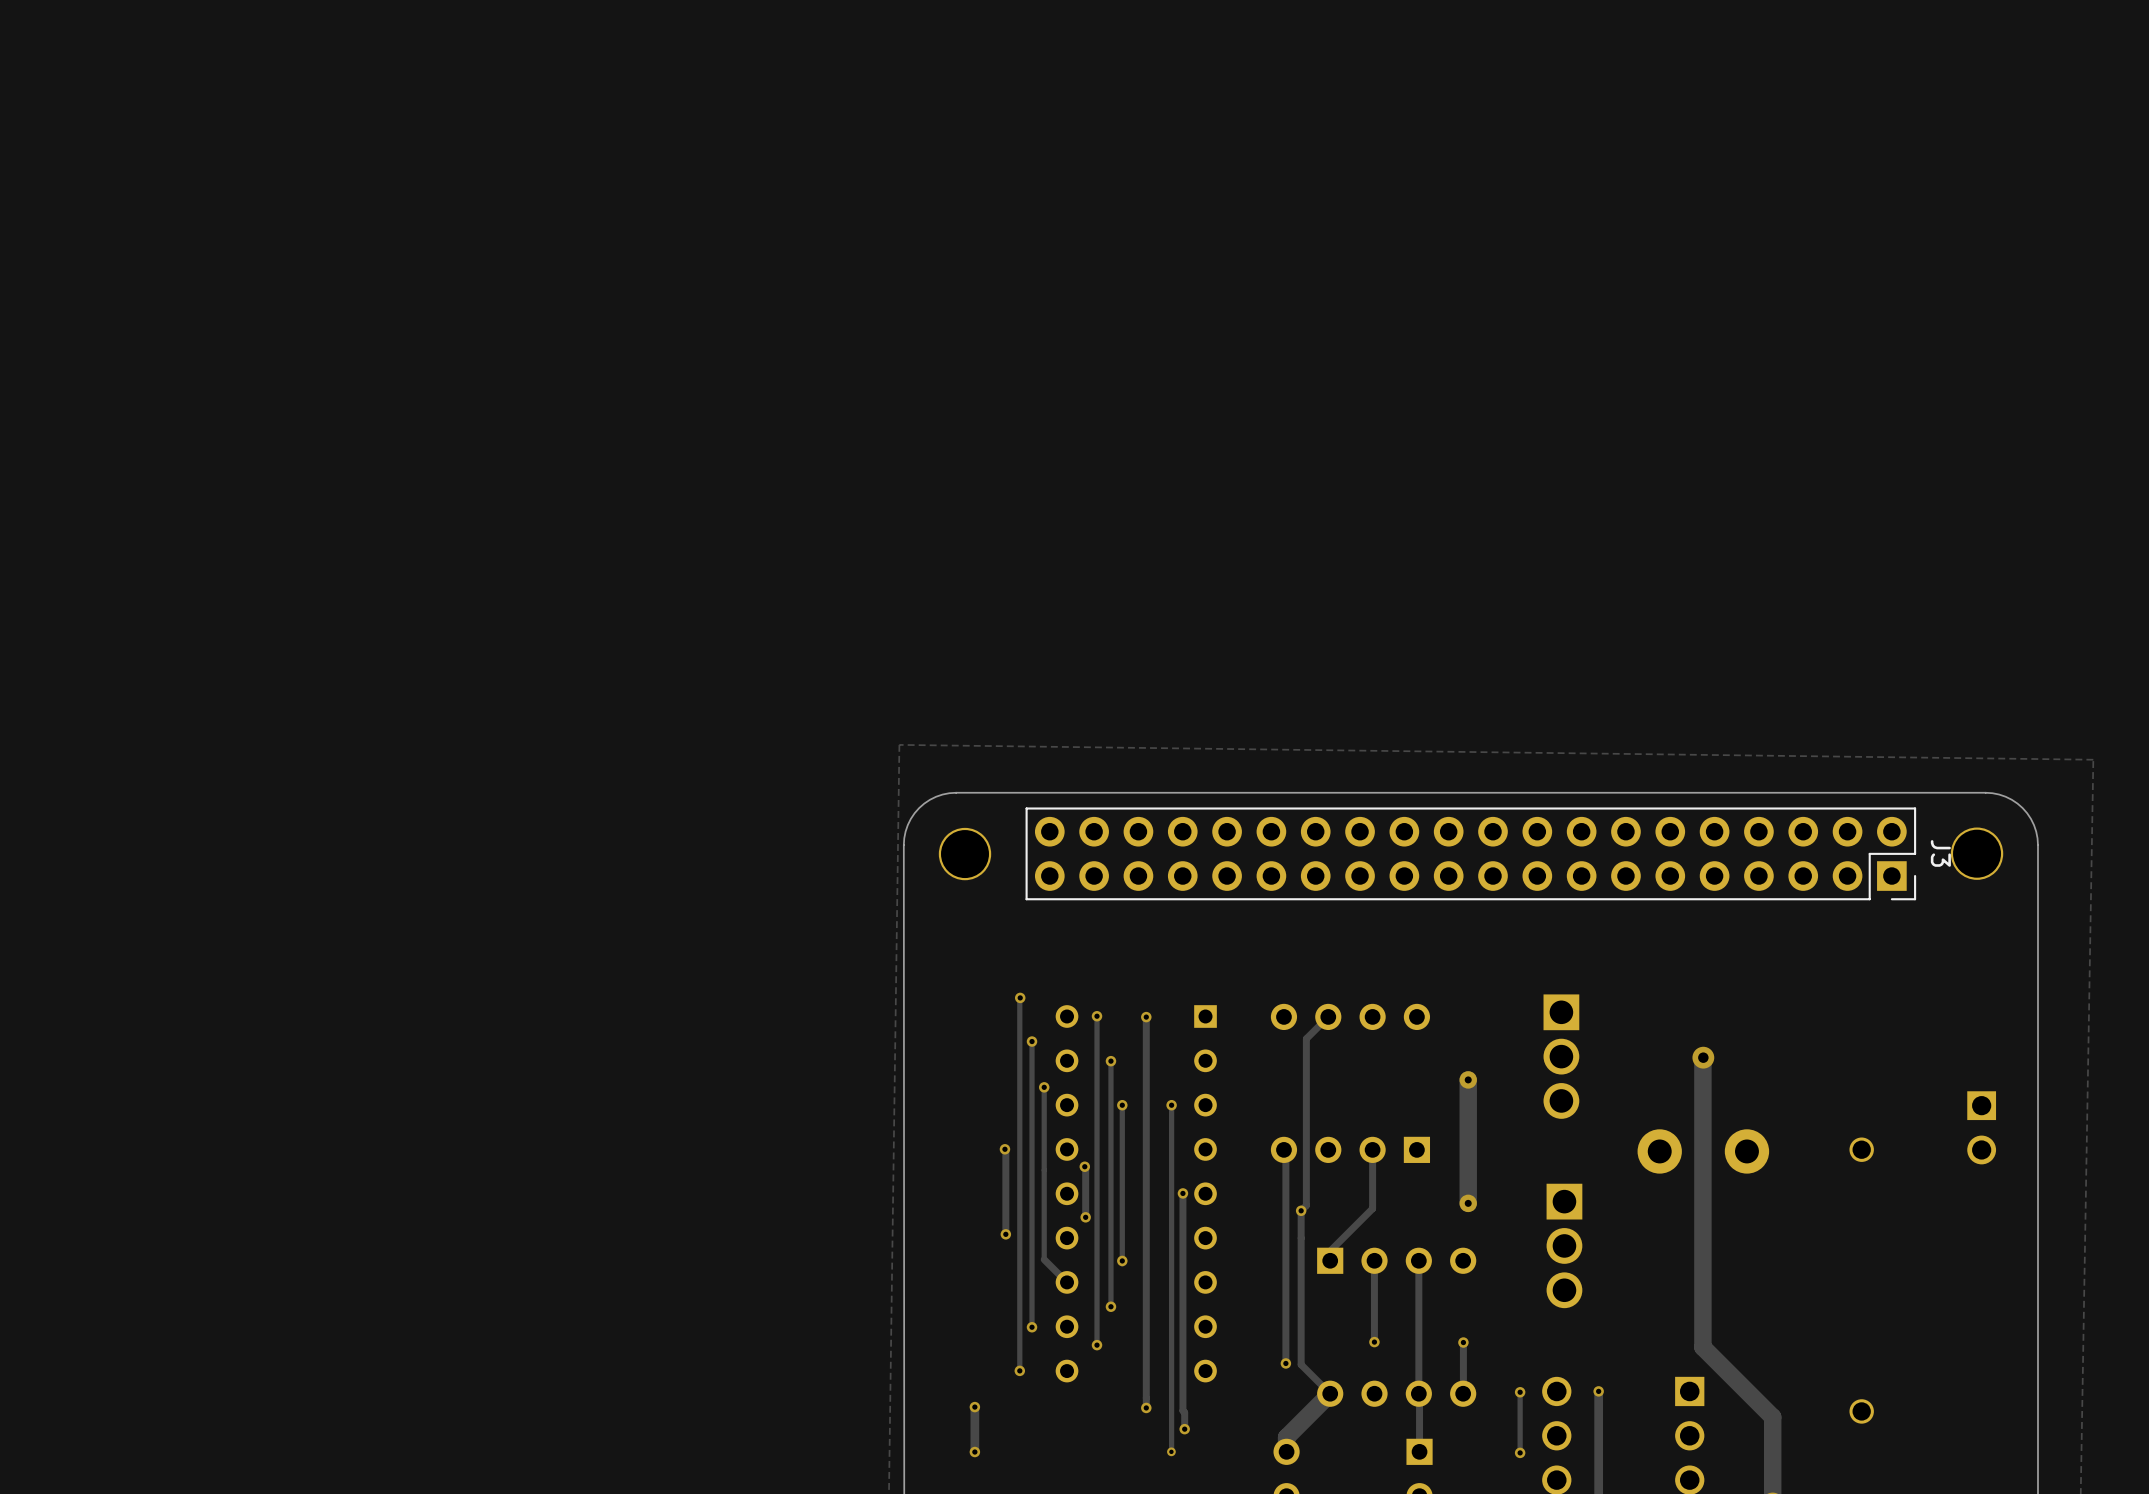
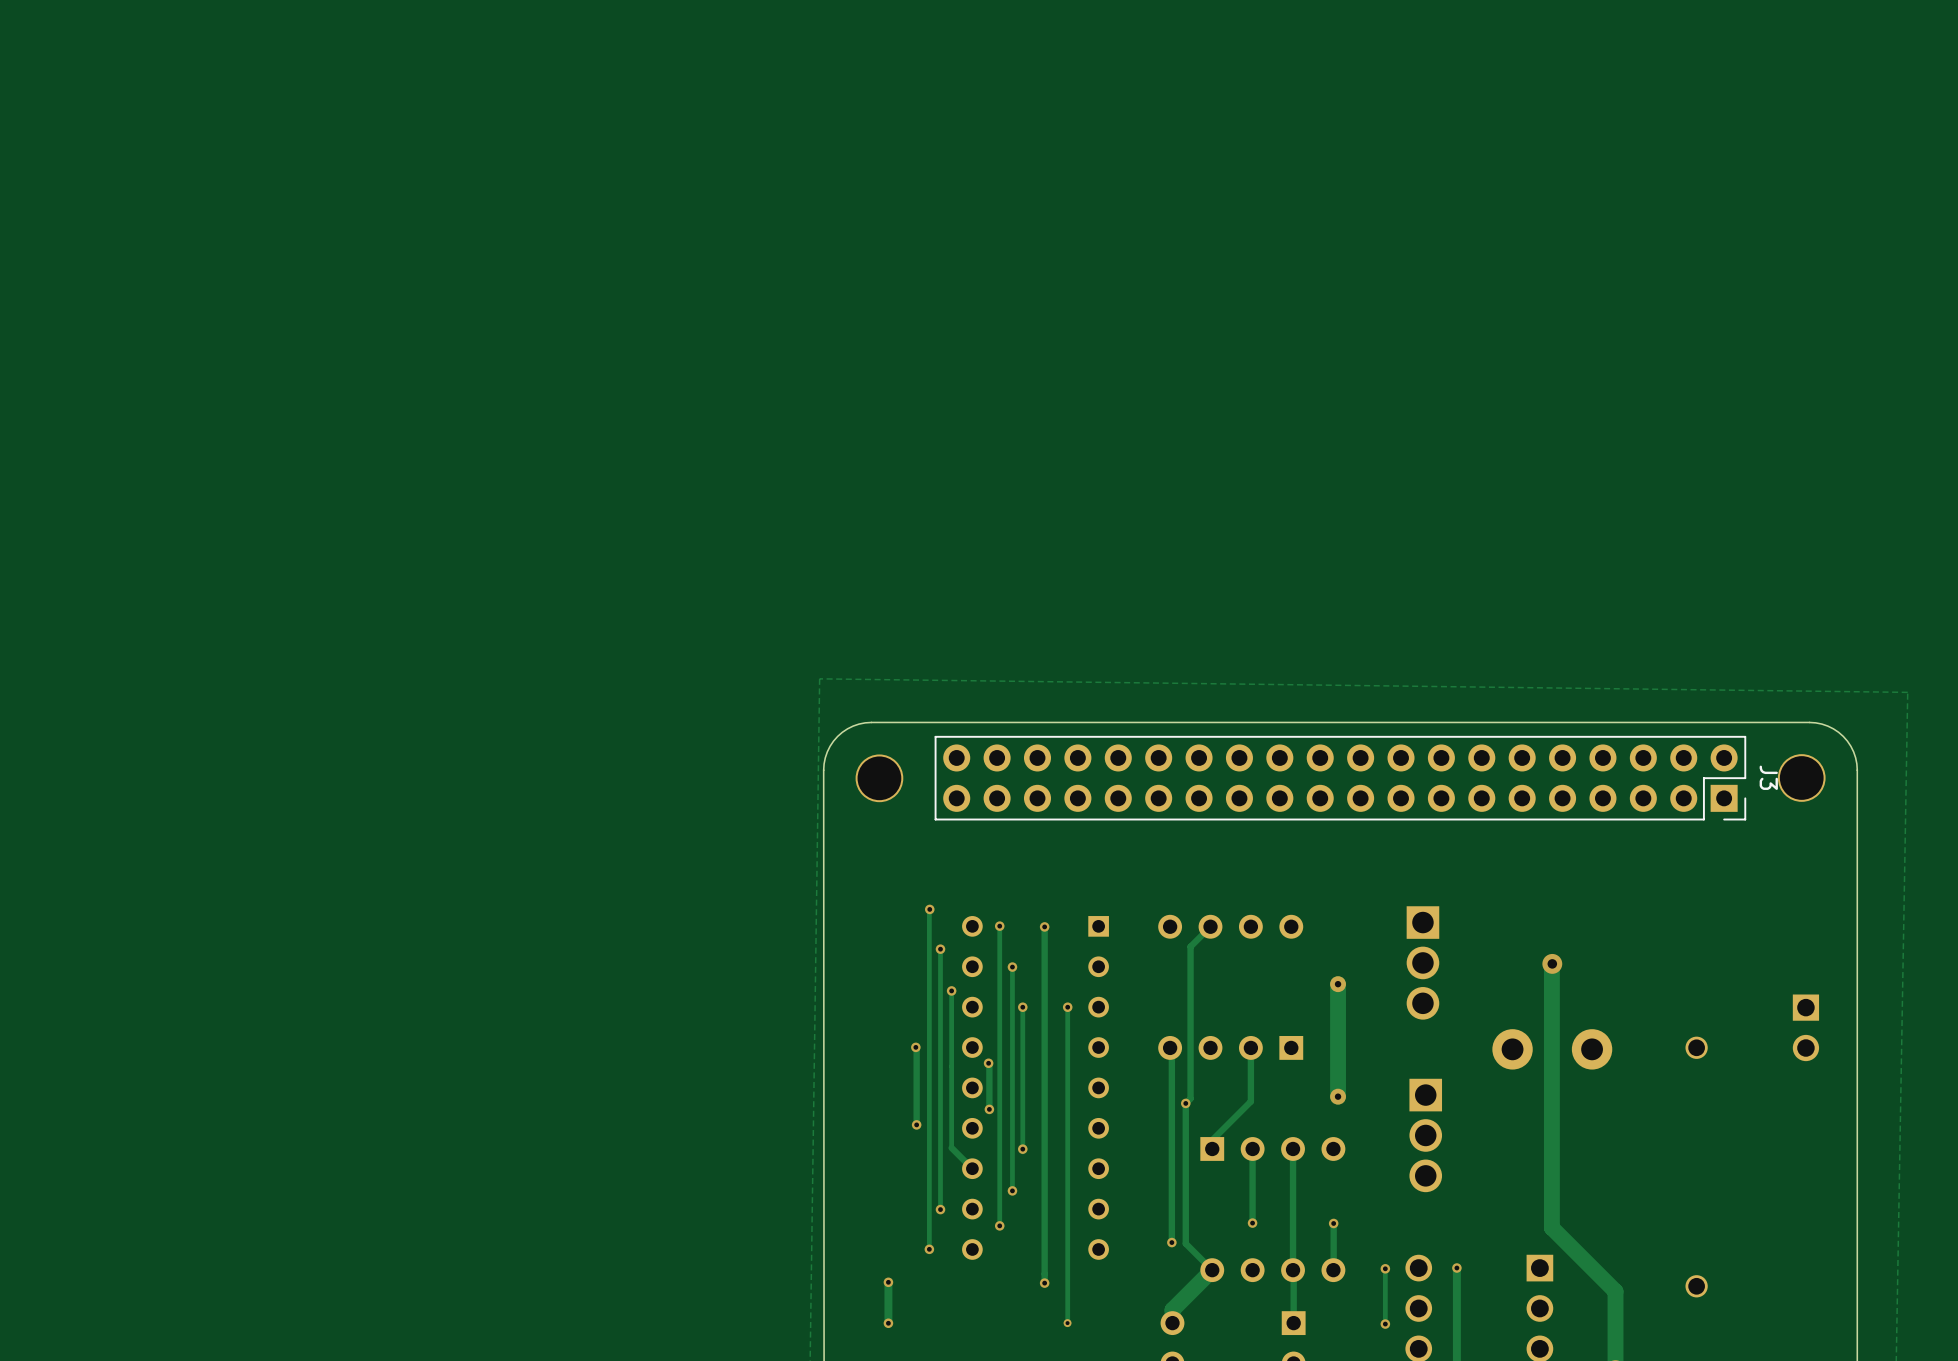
track: (1182, 1193) (1182, 1410) (1184, 1412) (1184, 1429) -> none
via: (1182, 1193) -> none
via: (1184, 1429) -> none

